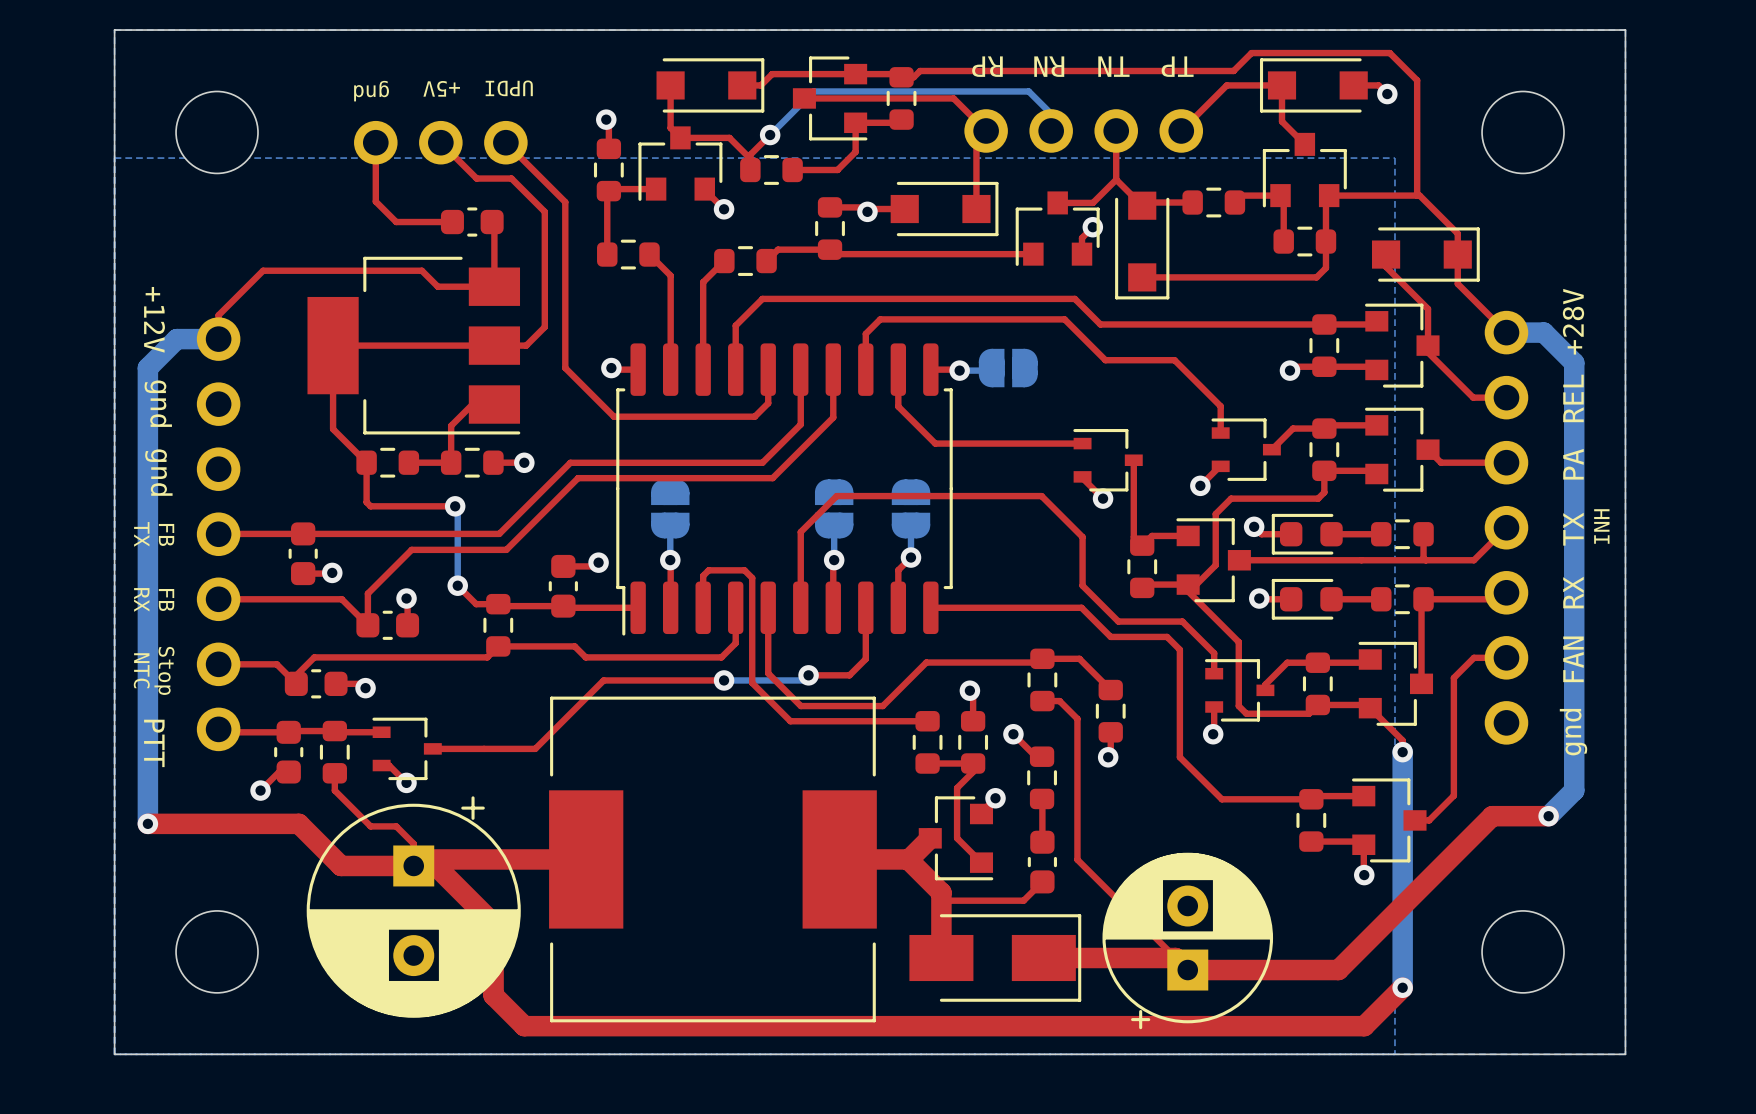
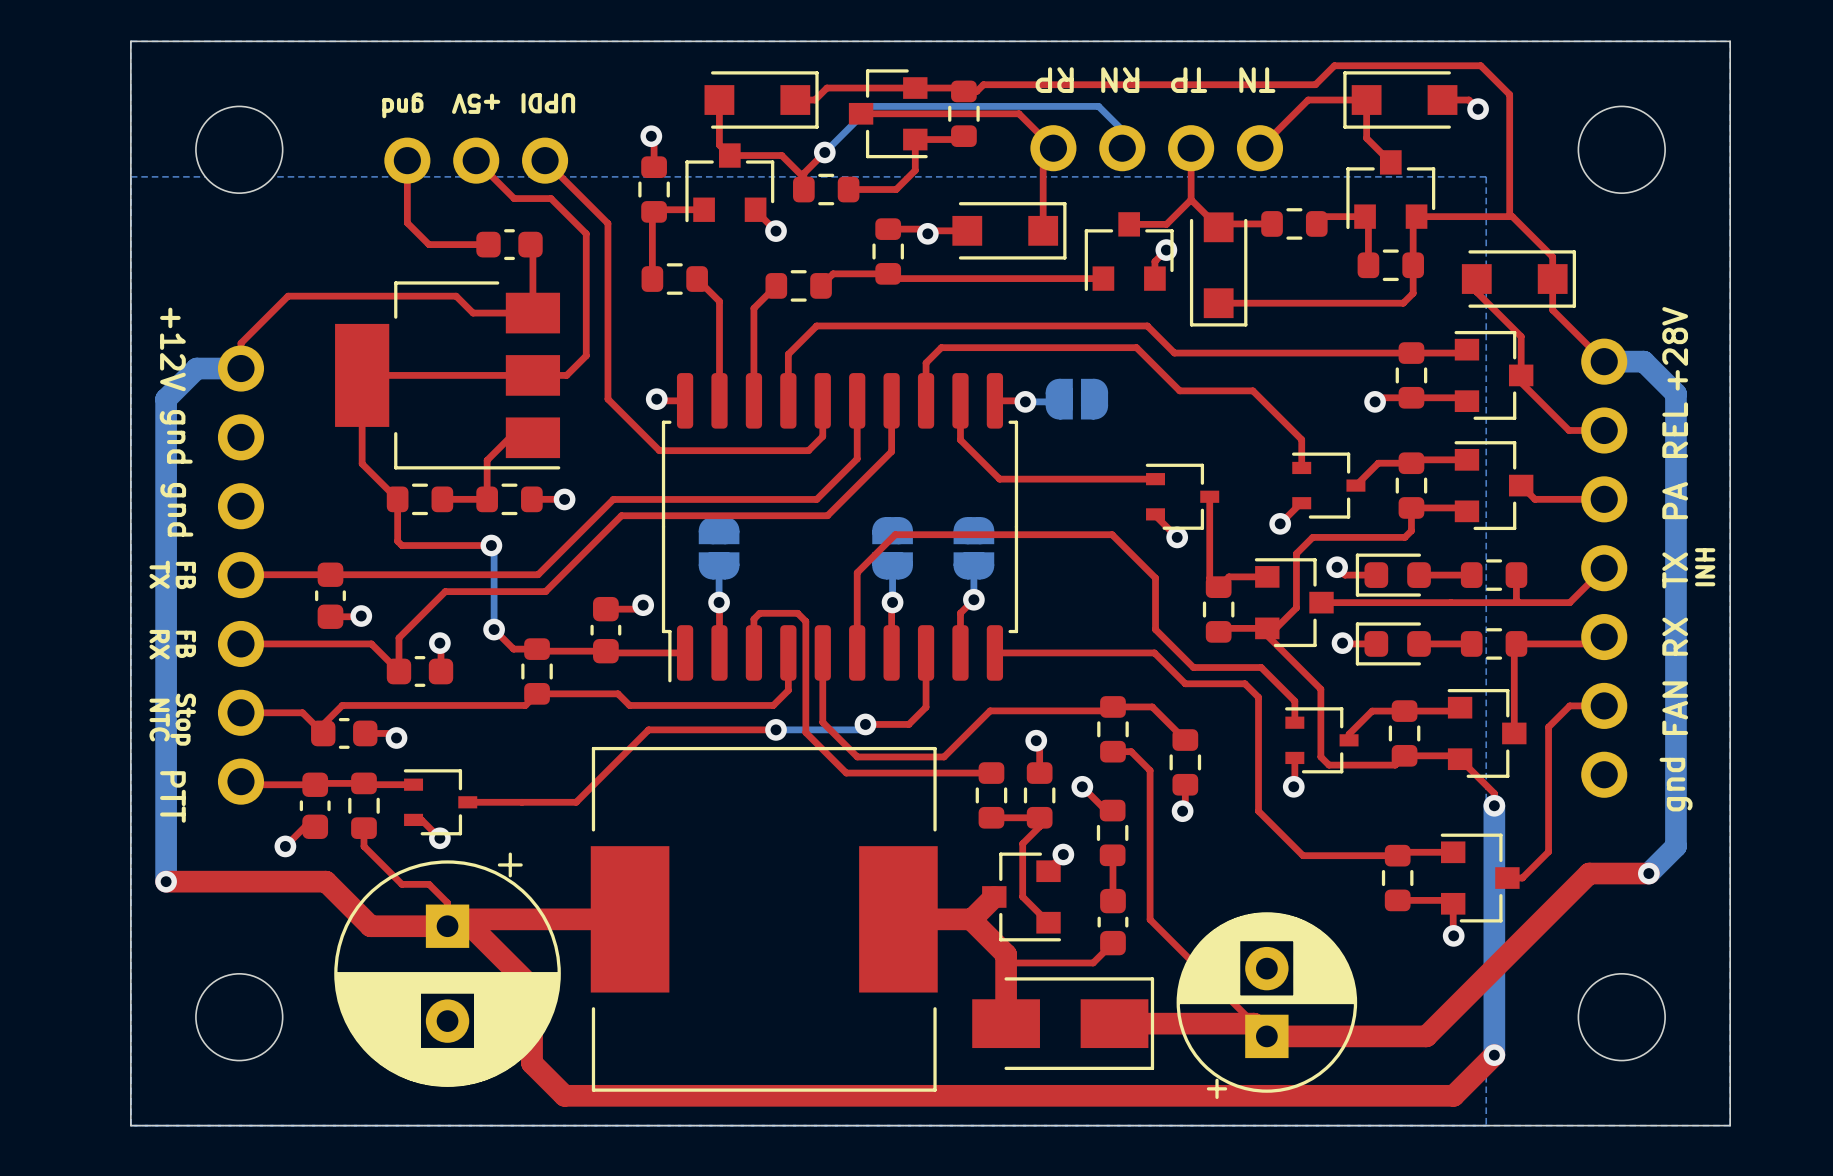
text: TN (1113, 66) -> TP (1189, 80)
text: TP (1177, 66) -> TN (1257, 80)

